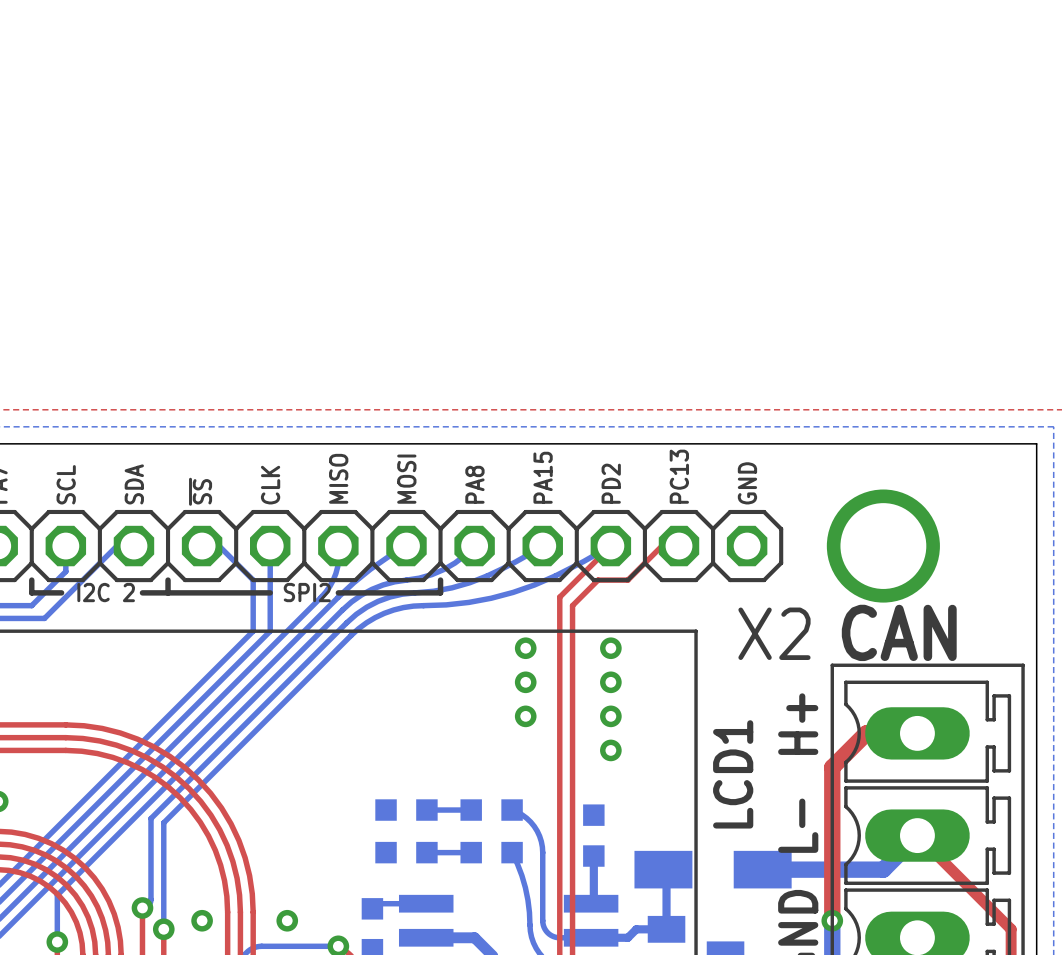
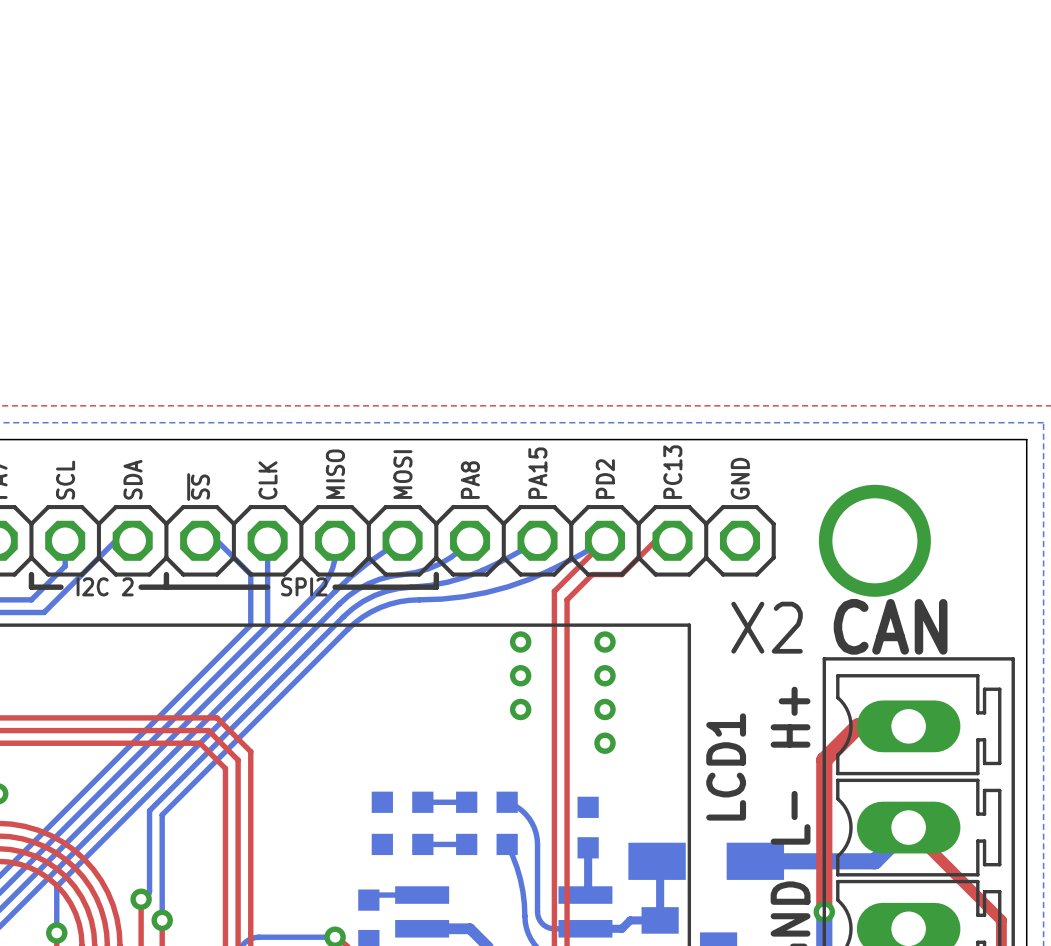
top track: (65, 724) (102, 728) (137, 739) (169, 756) (198, 779) (221, 808) (238, 840) (249, 875) (253, 912) -> (65, 717) (217, 717) (250, 751) (250, 903)
top track: (65, 737) (99, 741) (132, 750) (162, 767) (189, 788) (210, 815) (227, 845) (237, 878) (240, 912) -> (65, 730) (208, 730) (238, 760) (238, 903)
top track: (65, 750) (97, 753) (127, 762) (155, 777) (180, 797) (200, 822) (215, 850) (224, 880) (227, 912) -> (65, 743) (200, 743) (225, 768) (225, 903)
via: (202, 920) -> none
via: (287, 920) -> none

